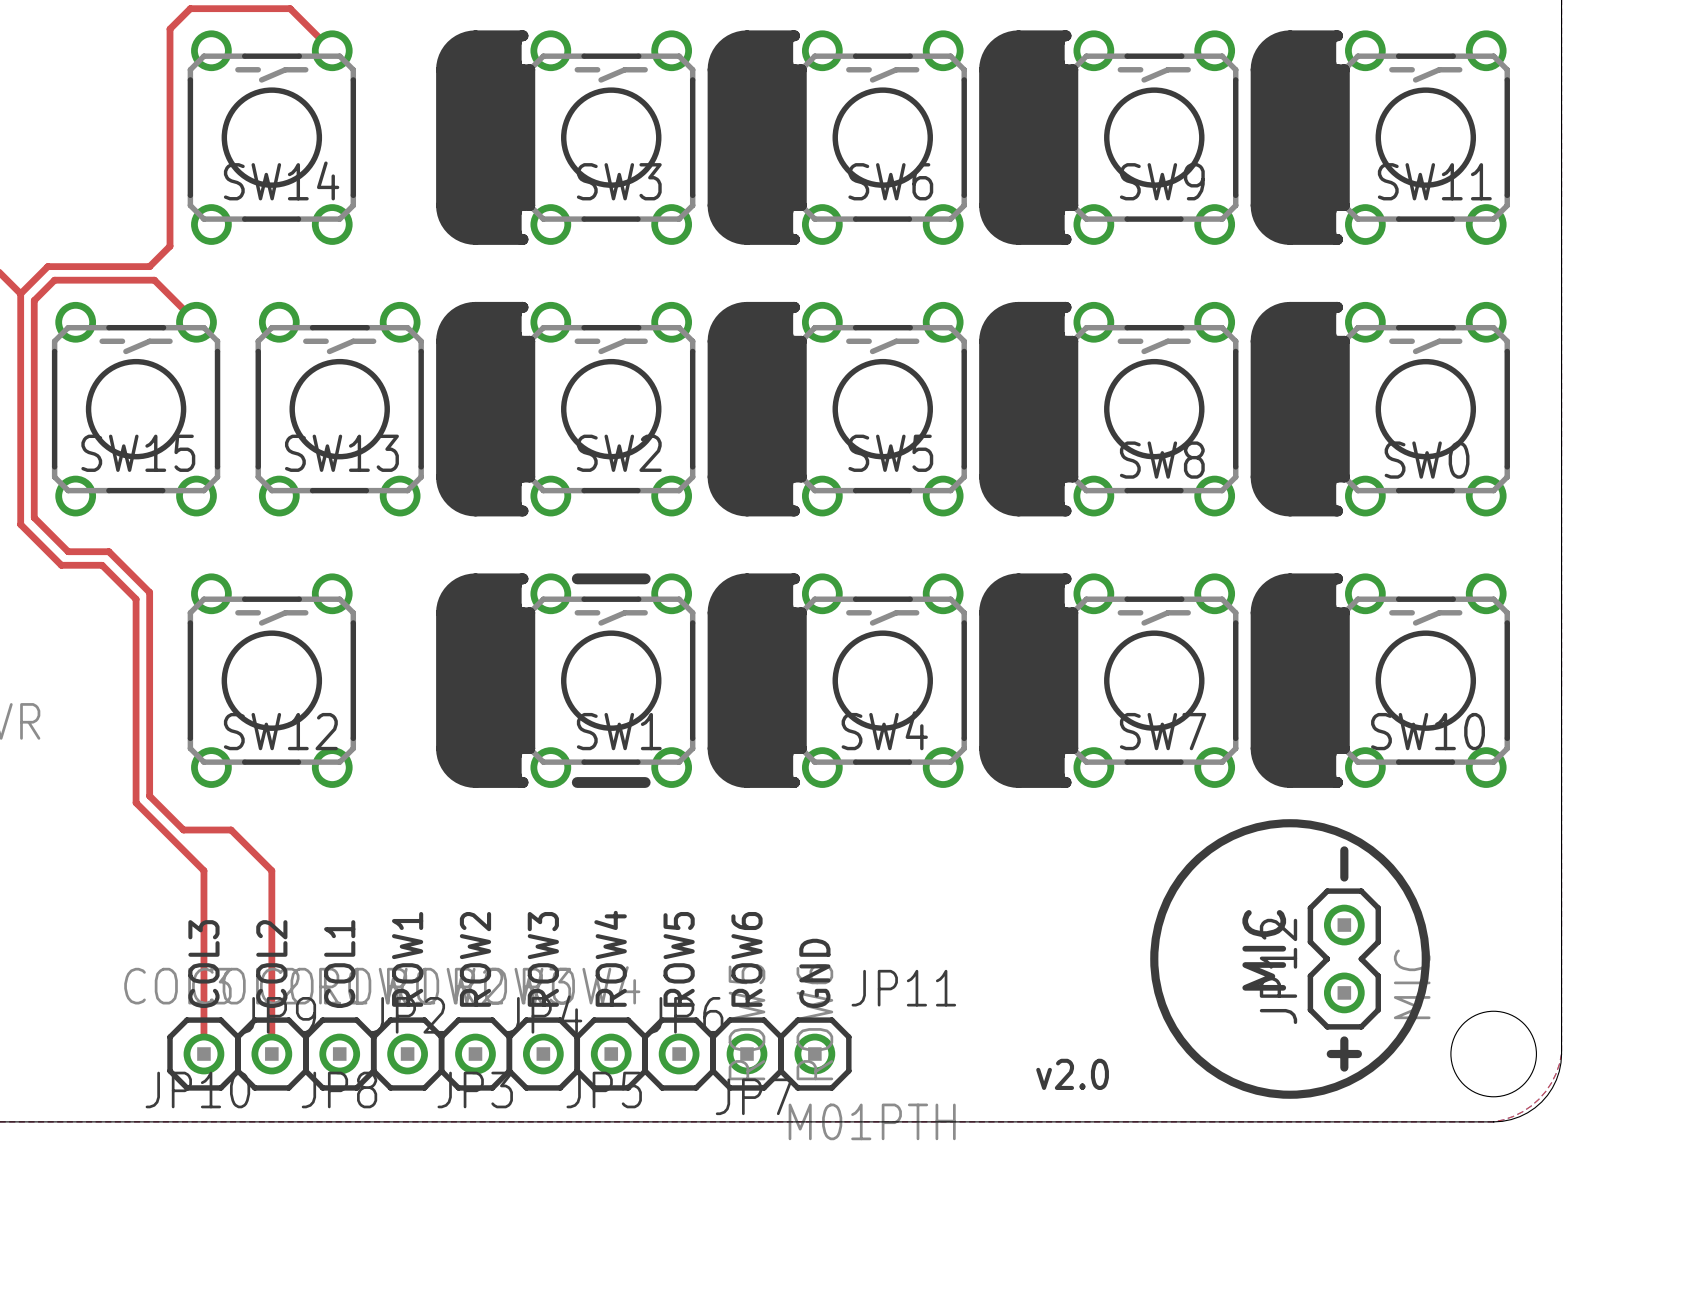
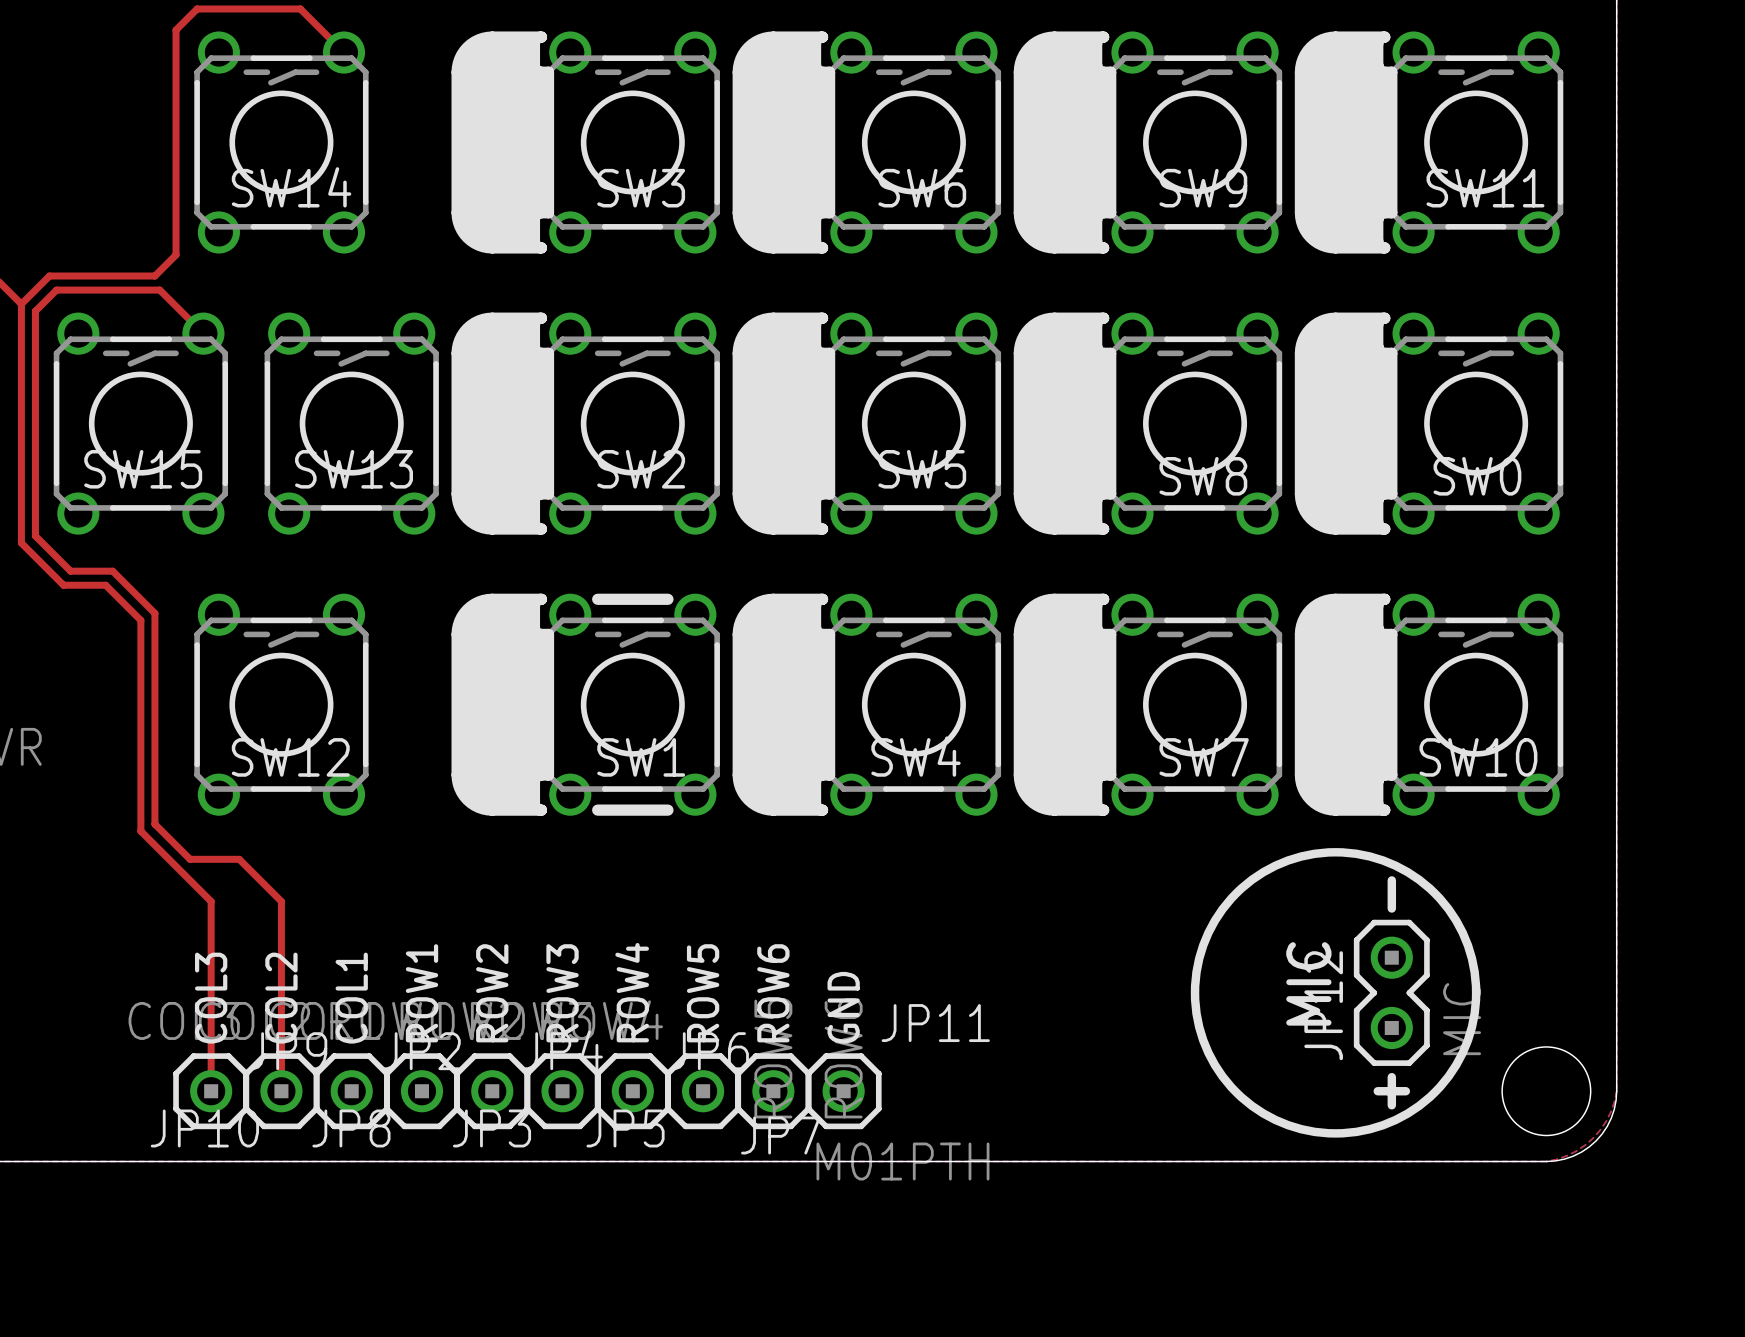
text: v2.0 (1072, 1074) -> none

